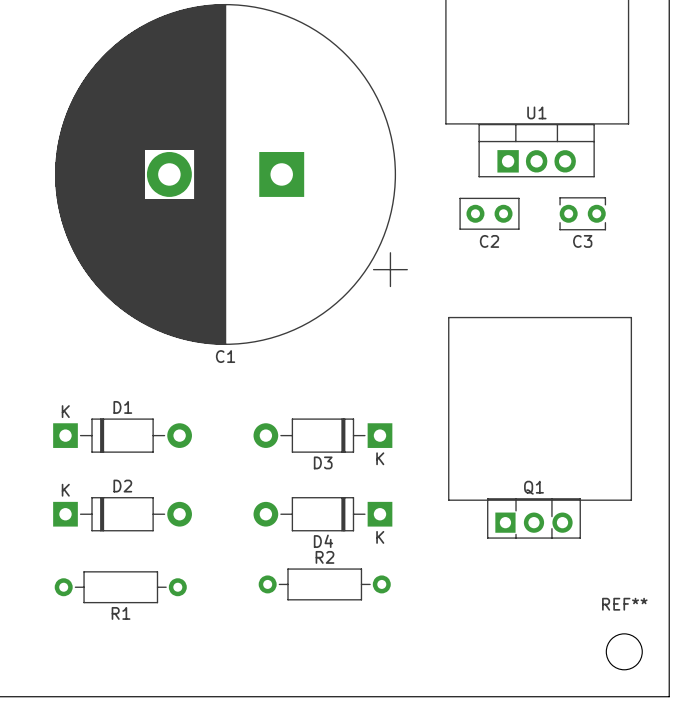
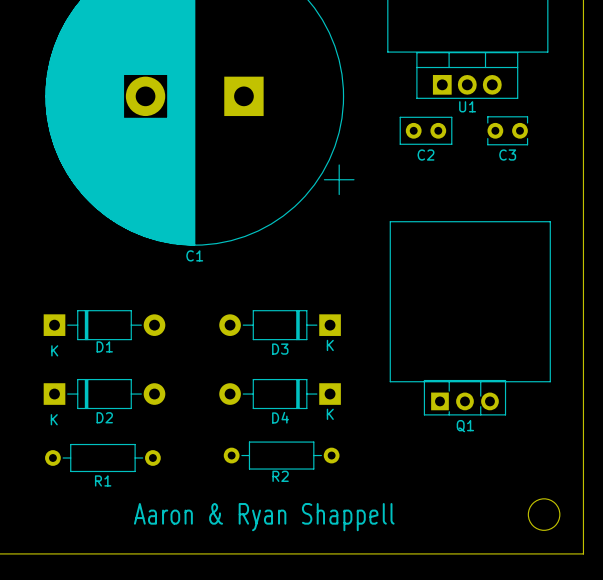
U1 name position: U1 (536, 112) -> U1 (467, 106)
D1 name position: D1 (122, 407) -> D1 (104, 346)
D1 text position: K (65, 411) -> K (54, 350)
D2 name position: D2 (122, 486) -> D2 (104, 417)
Q1 name position: Q1 (533, 487) -> Q1 (465, 426)
D2 text position: K (65, 490) -> K (54, 419)
R2 name position: R2 (325, 557) -> R2 (280, 476)
REF** name: REF** (624, 604) -> none
text: none -> Aaron & Ryan Shappell (264, 517)

